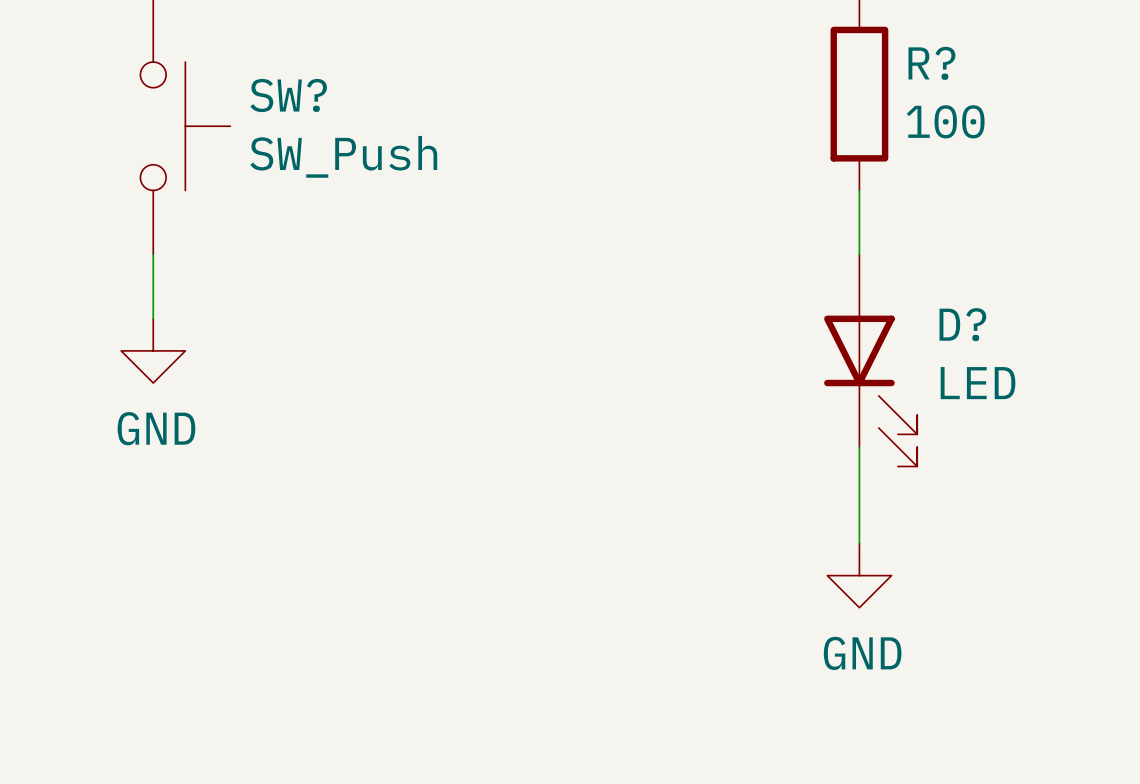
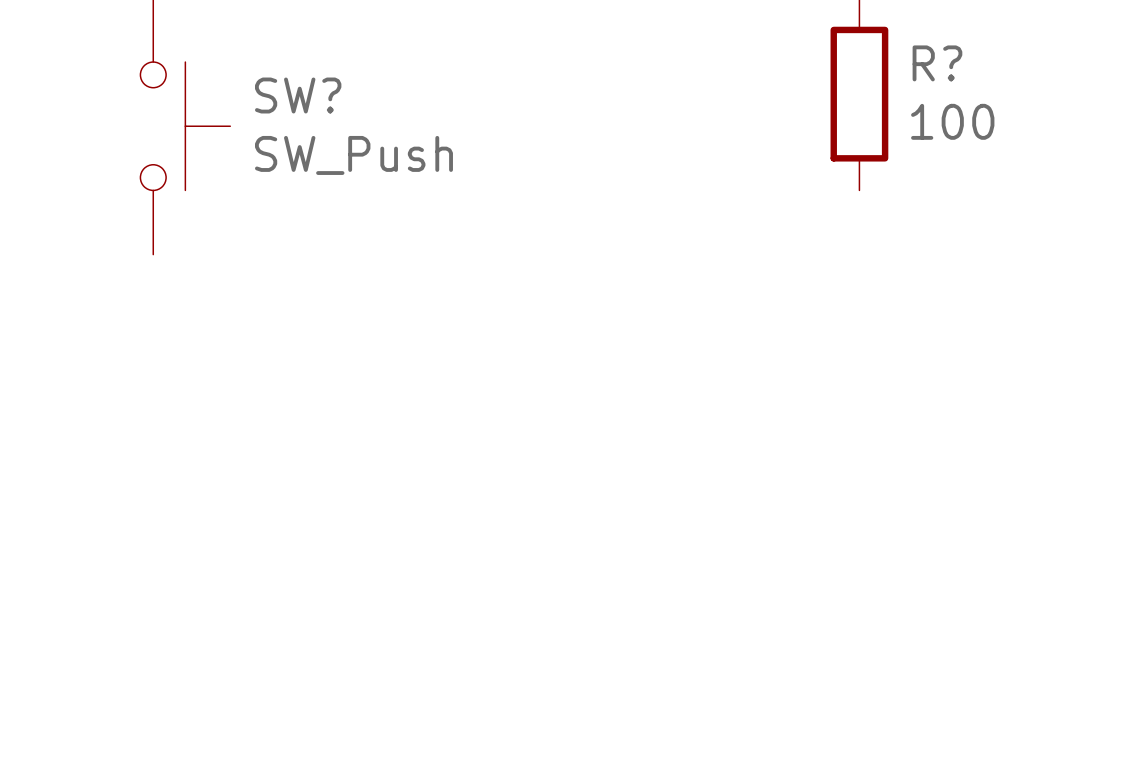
wire: (859, 190) (859, 254) -> none
wire: (153, 254) (153, 318) -> none
power symbol: GND (153, 350) -> none
D?: LED (870, 360) -> none
wire: (859, 447) (859, 543) -> none
power symbol: GND (859, 575) -> none

